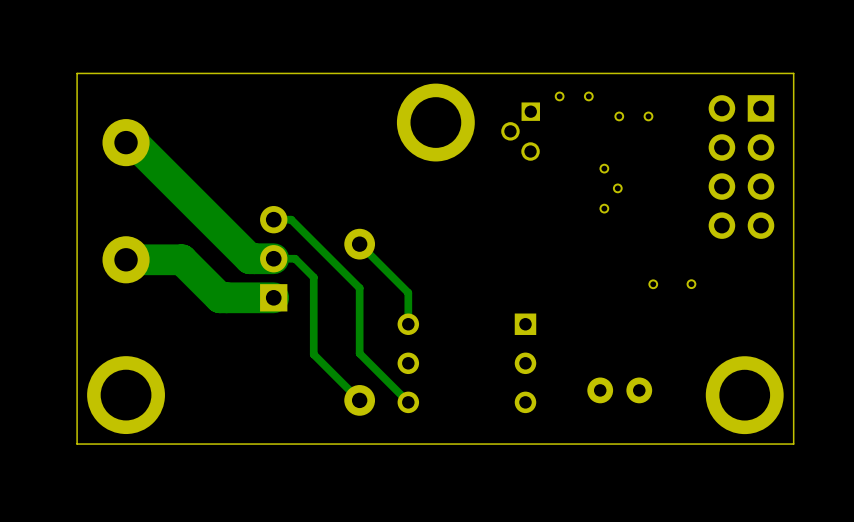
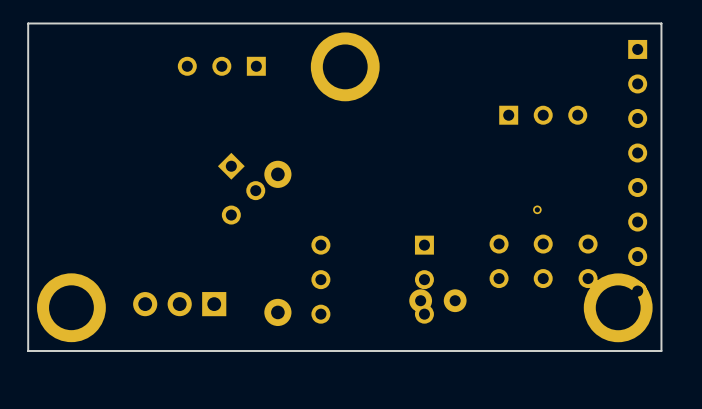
part: (559, 96) -> none
part: (588, 96) -> none
part: (619, 116) -> none
part: (648, 116) -> none
part: none -> (221, 66)
part: (520, 131) -> none
part: (126, 142) -> none
track: (133, 142) (249, 258) (295, 258) (313, 277) (313, 354) (359, 400) -> none
part: (741, 167) -> none
part: (604, 168) -> none
part: none -> (543, 115)
part: (617, 188) -> none
part: (604, 208) -> none
track: (273, 219) (291, 219) (359, 288) (359, 353) (408, 402) -> none
part: none -> (637, 170)
track: (359, 244) (408, 292) (408, 324) -> none
part rotation: 0° (273, 258) -> 90° counterclockwise (179, 304)
part position: (273, 258) -> (179, 304)
part: (126, 259) -> none
track: (137, 259) (181, 259) (219, 297) (273, 297) -> none
part: none -> (241, 188)
part: (691, 284) -> none
part: none -> (499, 261)
part: none -> (543, 261)
part: none -> (588, 261)
part position: (619, 390) -> (437, 300)

